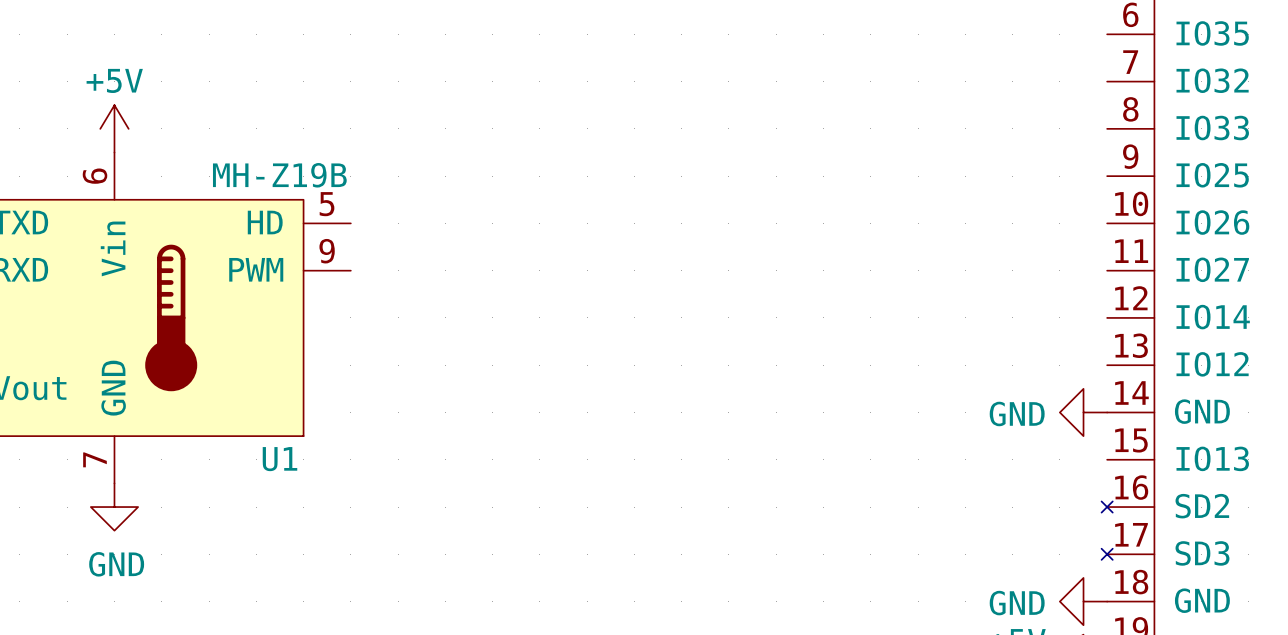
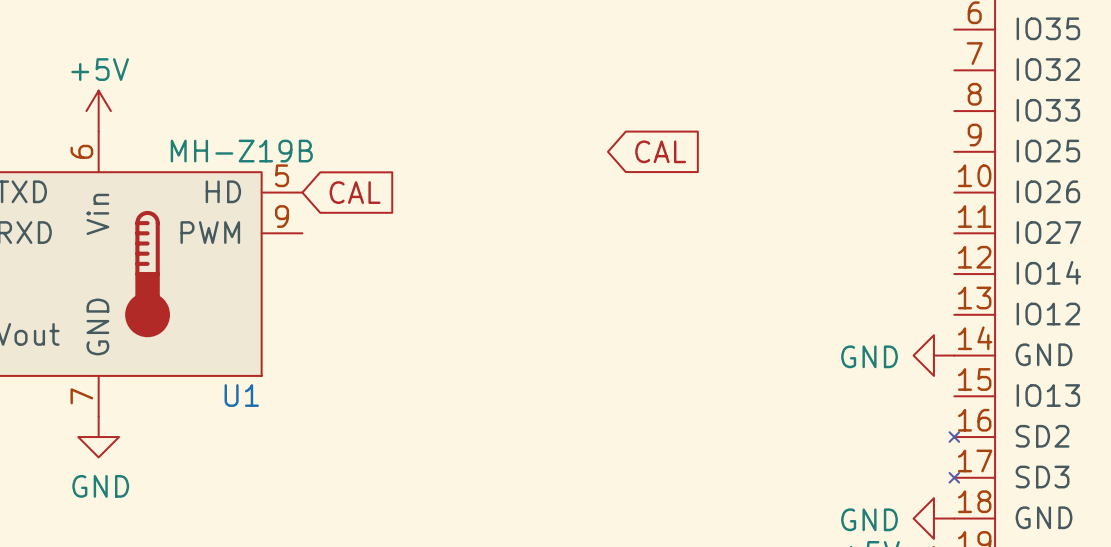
global label: none -> CAL (660, 151)
global label: none -> CAL (355, 192)

